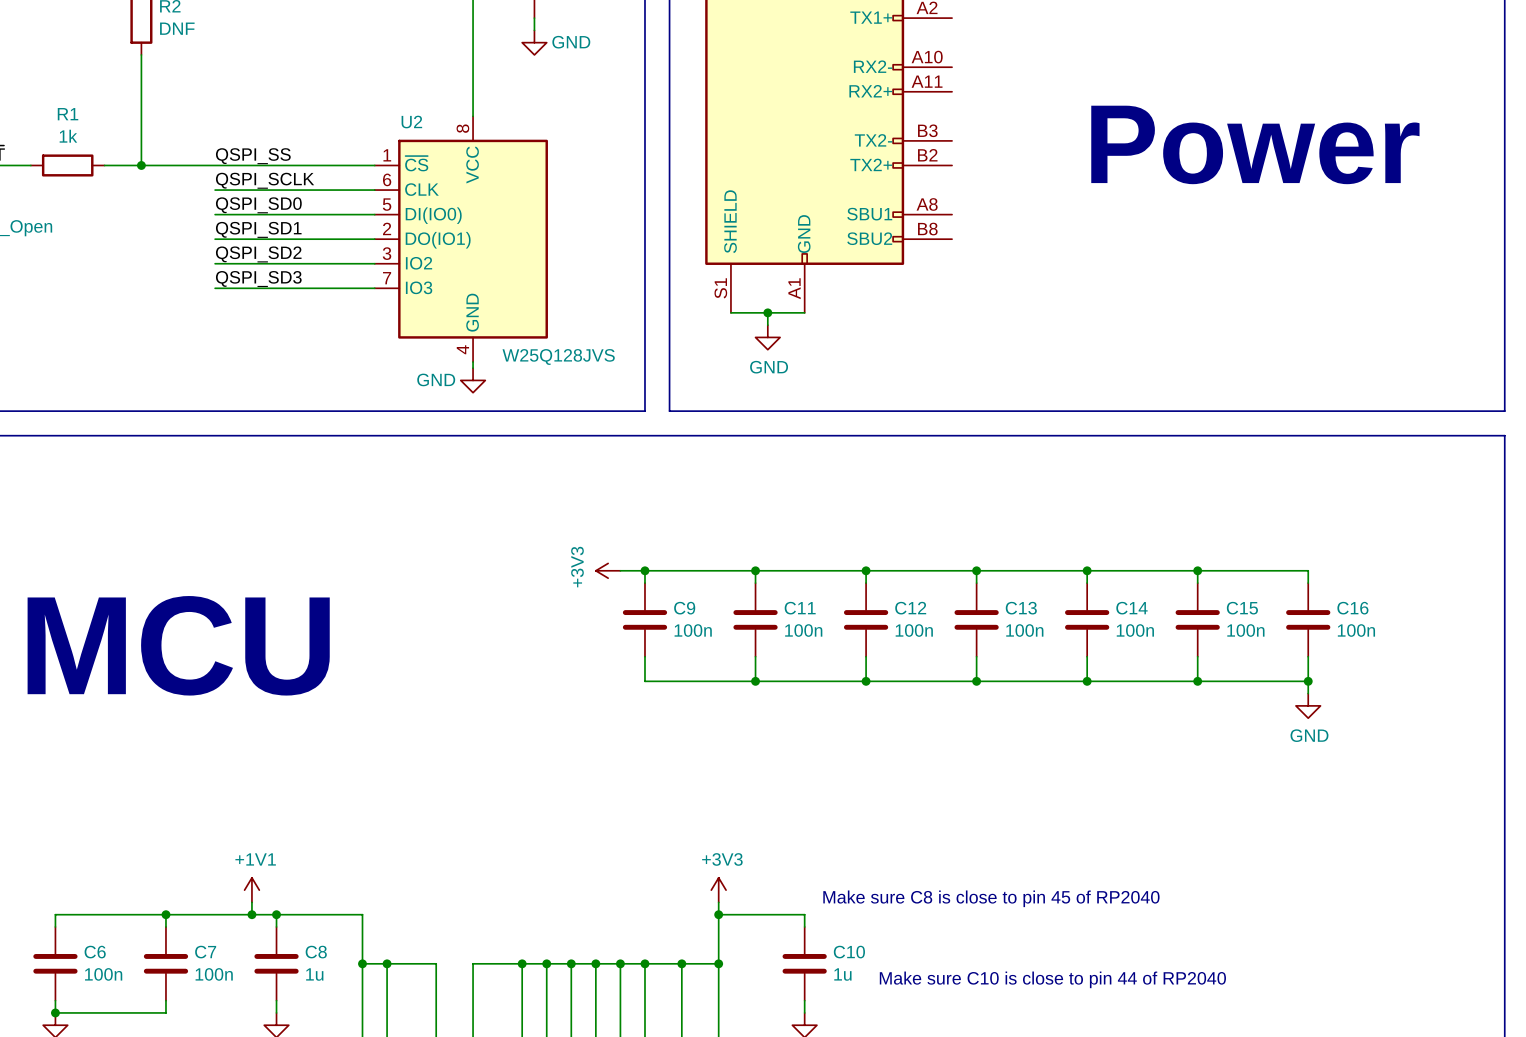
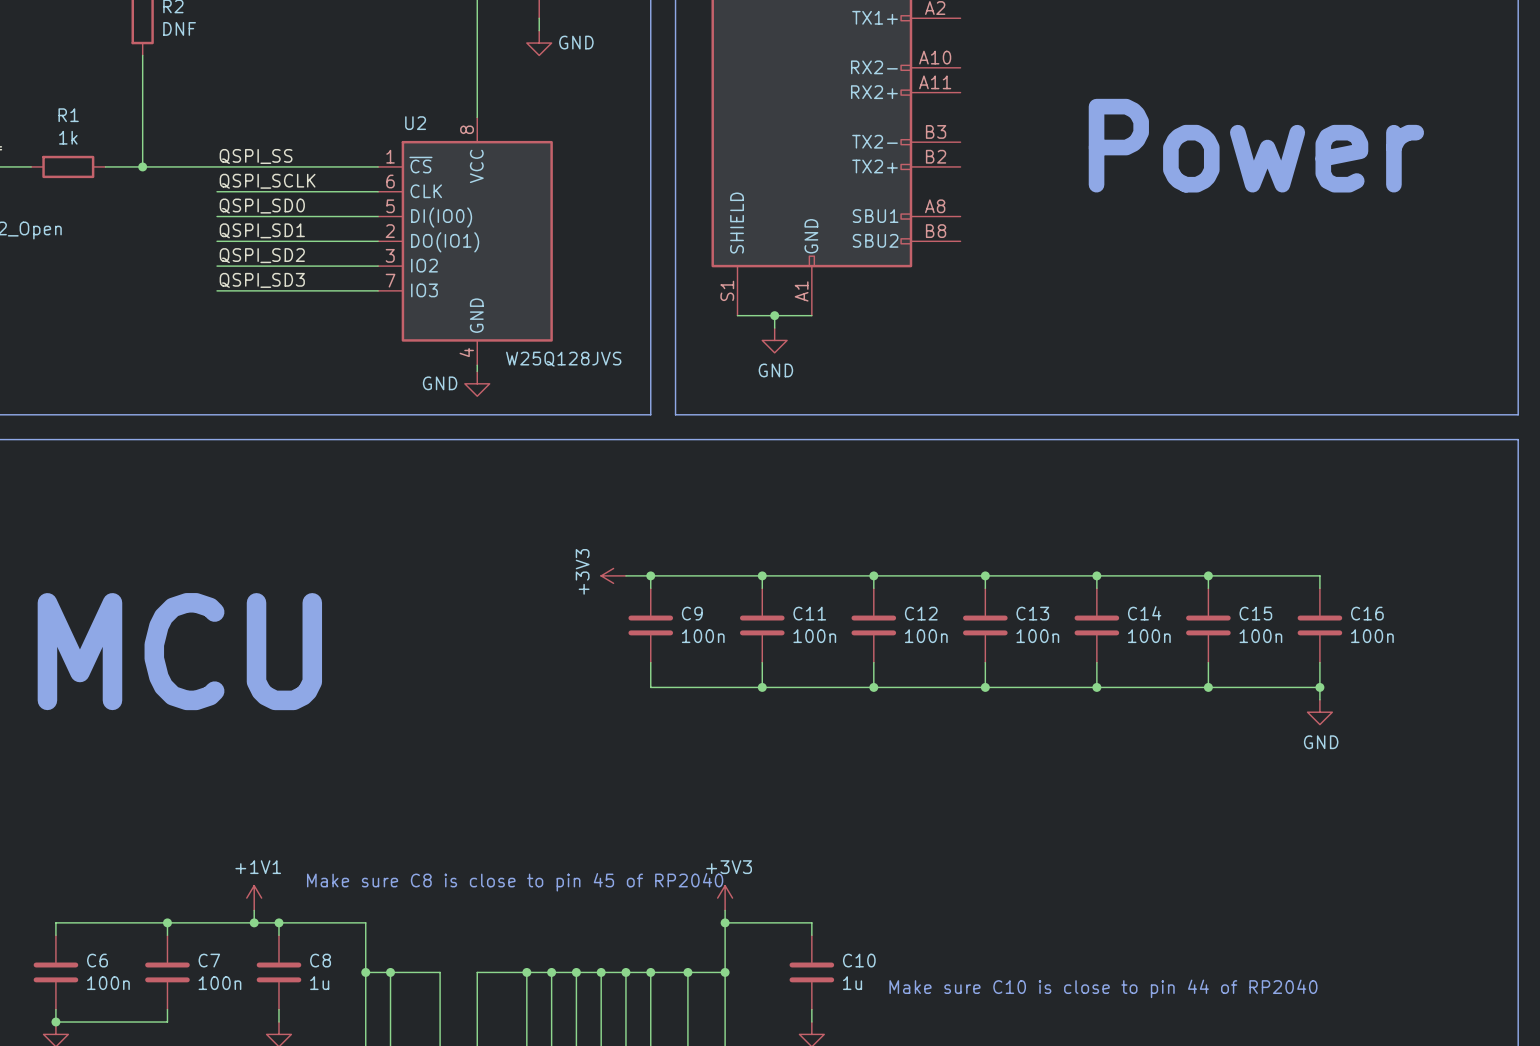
text: none -> Make sure C8 is close to pin 45 of RP2040 (515, 882)
text: Make sure C8 is close to pin 45 of RP2040 (991, 898) -> none

